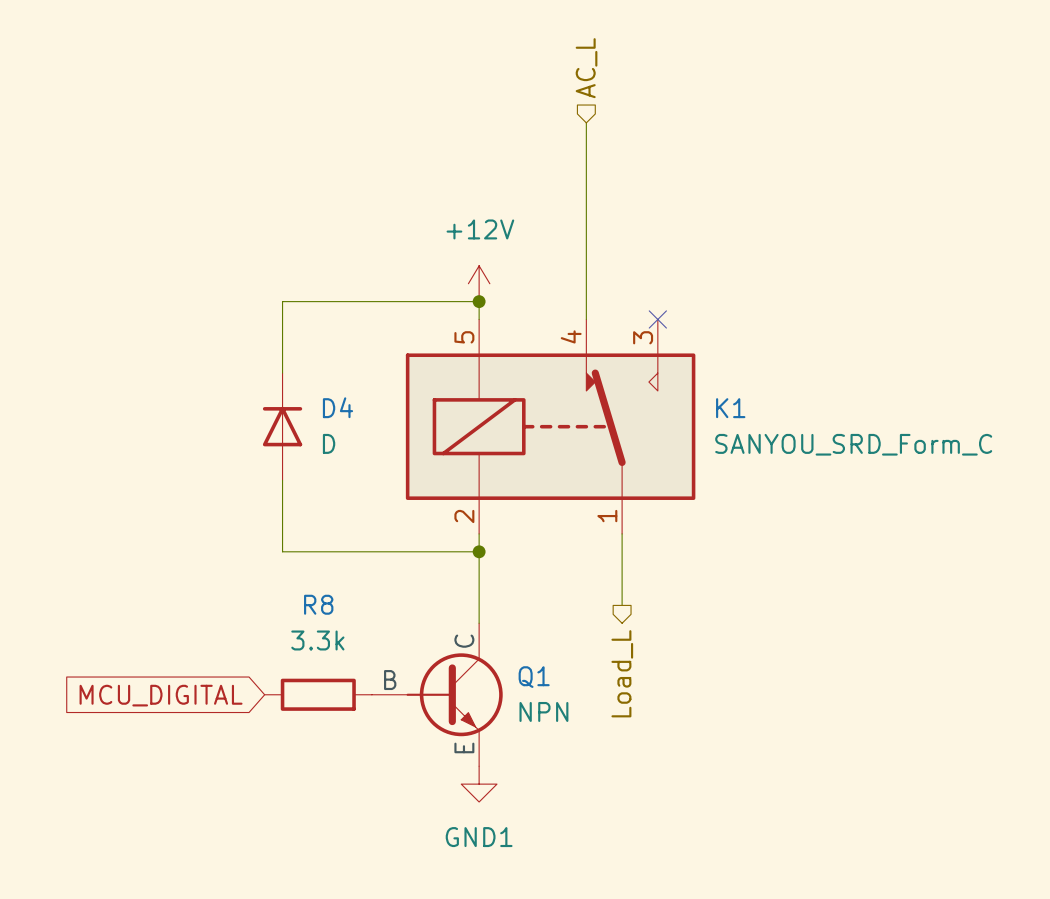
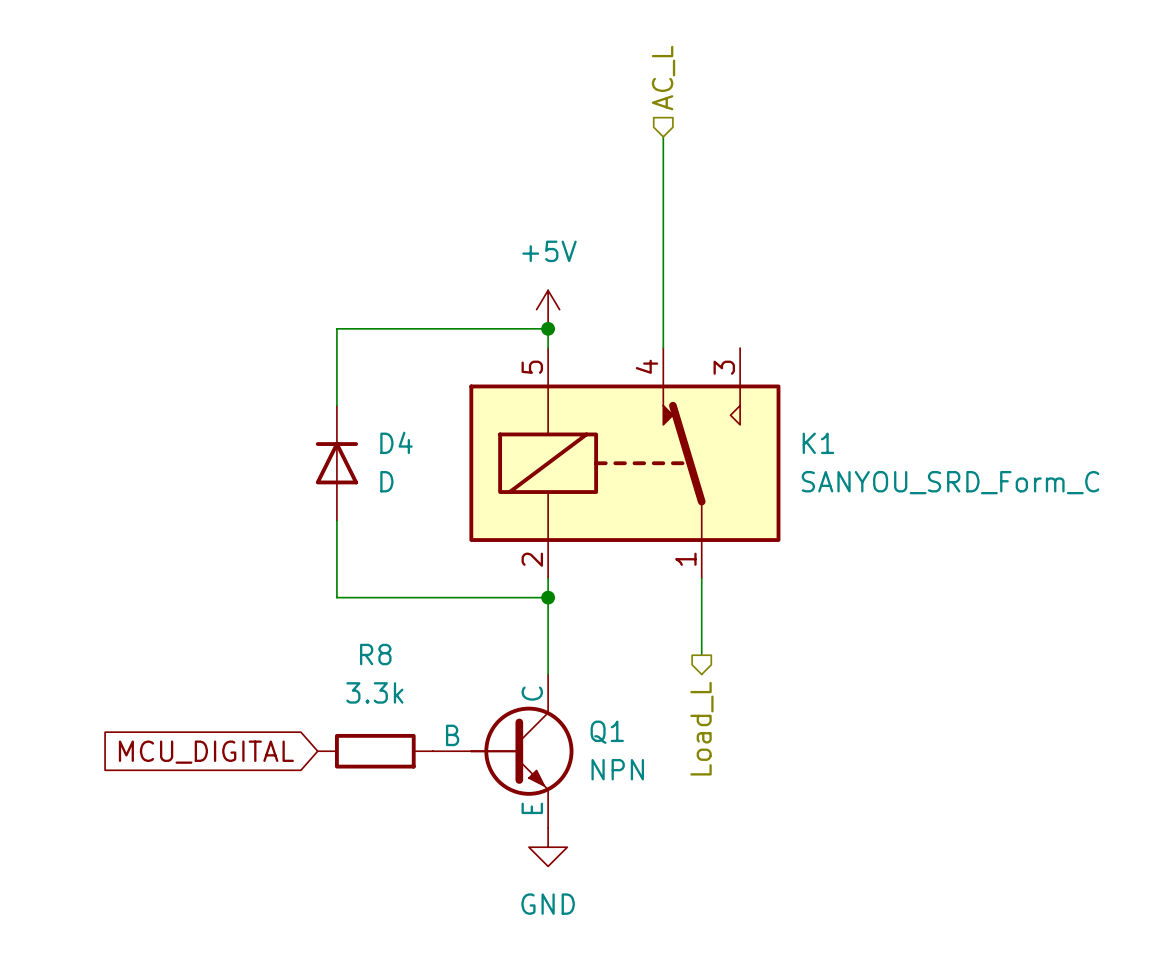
power symbol: +12V (479, 283) -> +5V (548, 309)
no-connect mark: (657, 319) -> none
power symbol: GND1 (479, 784) -> GND (548, 847)

